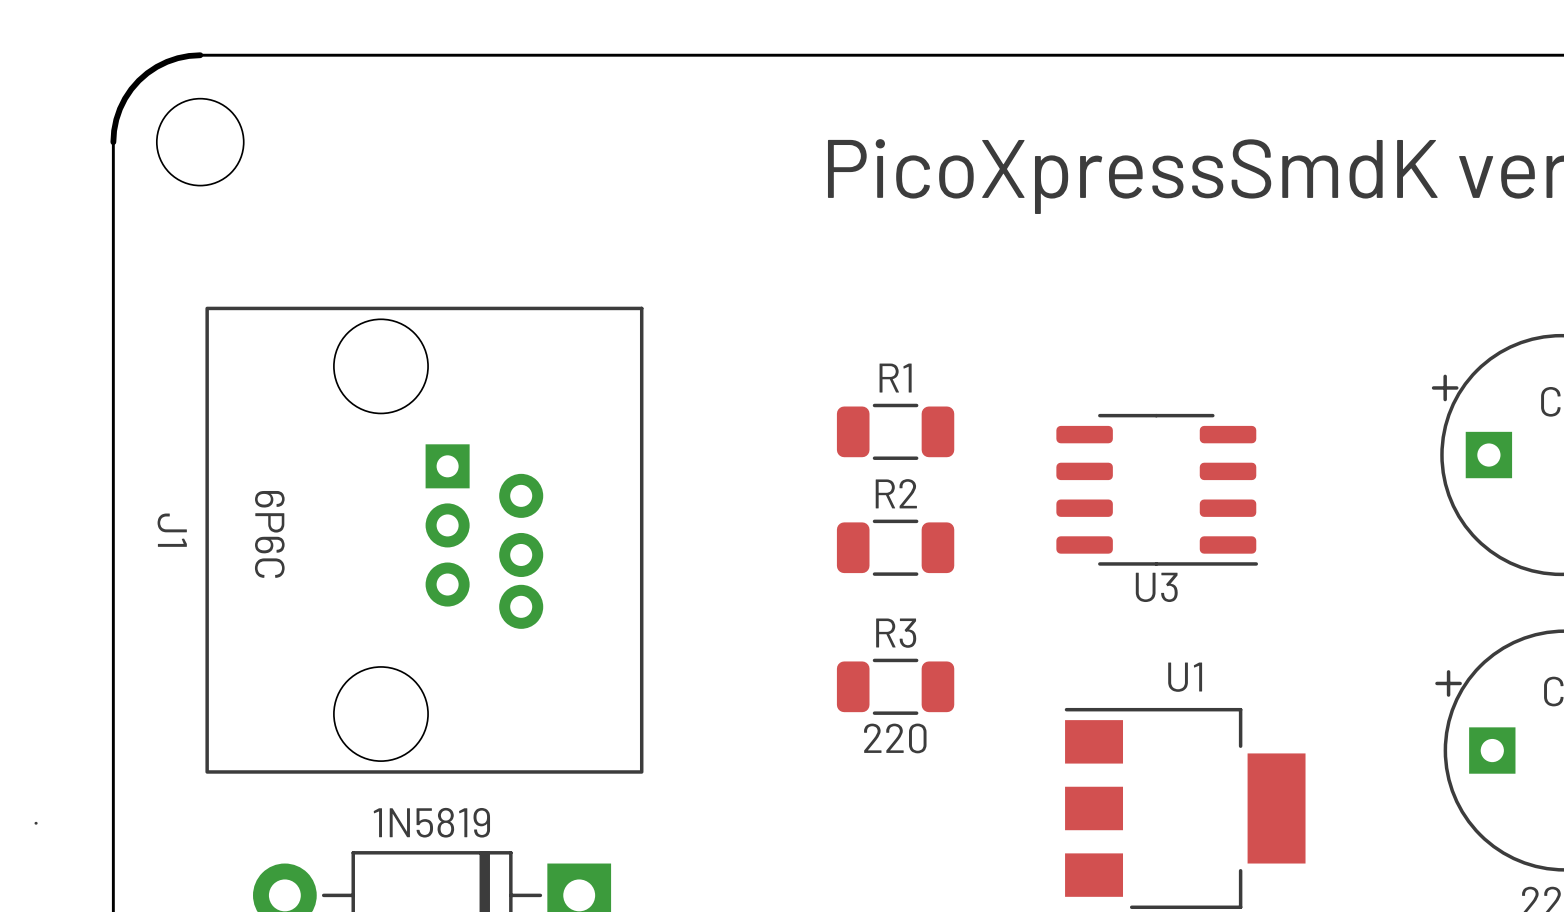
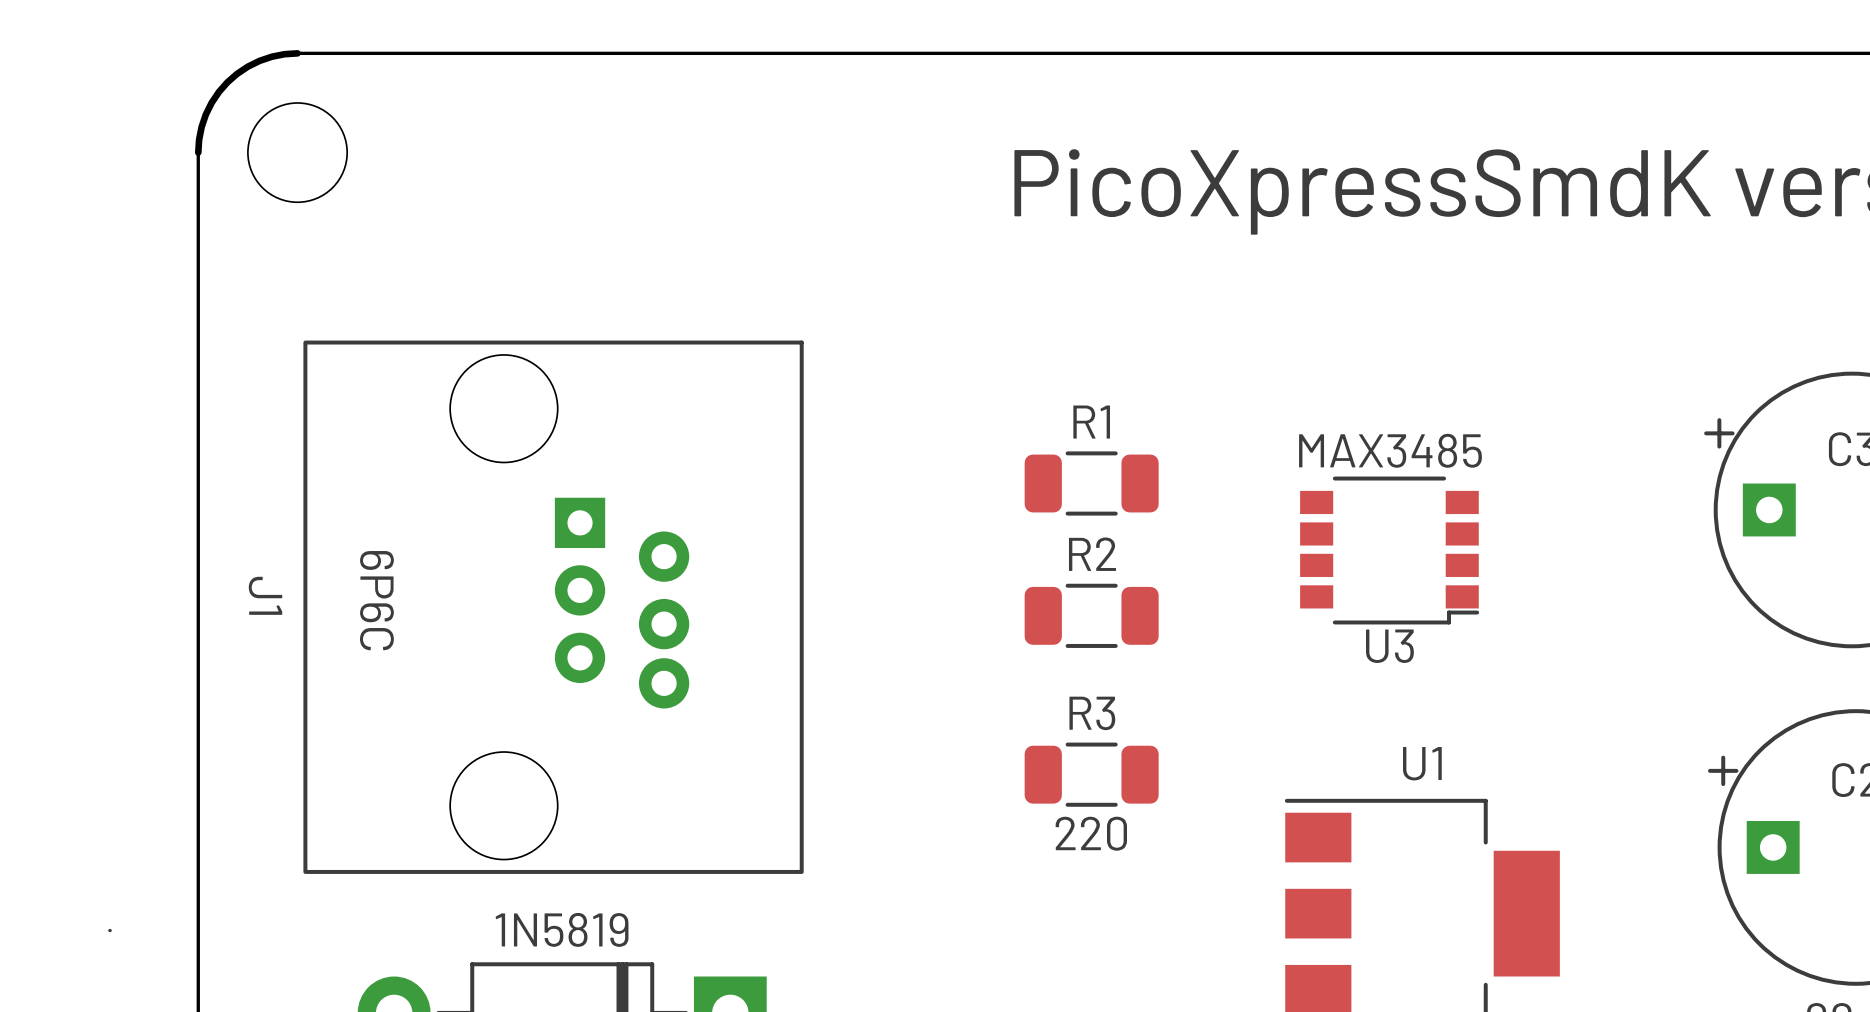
U3 value: none -> MAX3485 (1390, 450)
U3 footprint: [1056, 413, 1259, 566] -> [1300, 476, 1480, 625]

